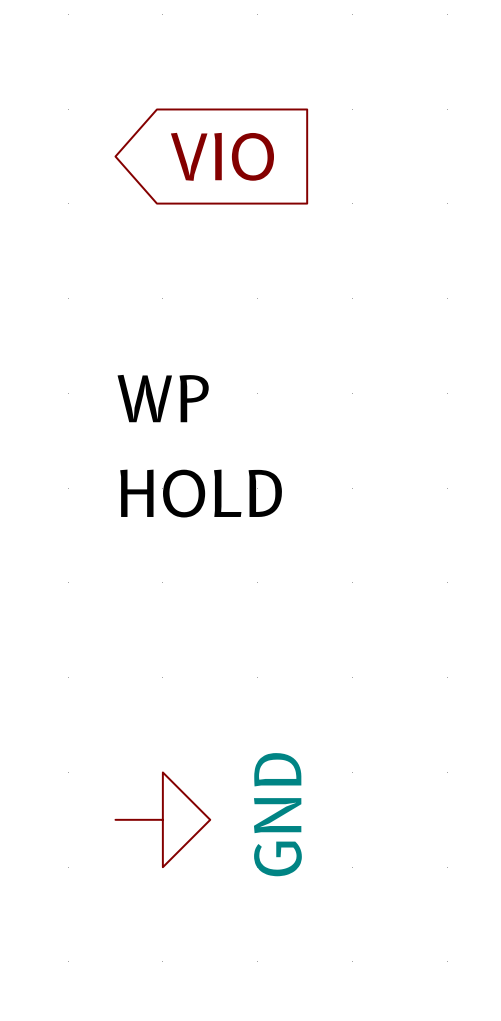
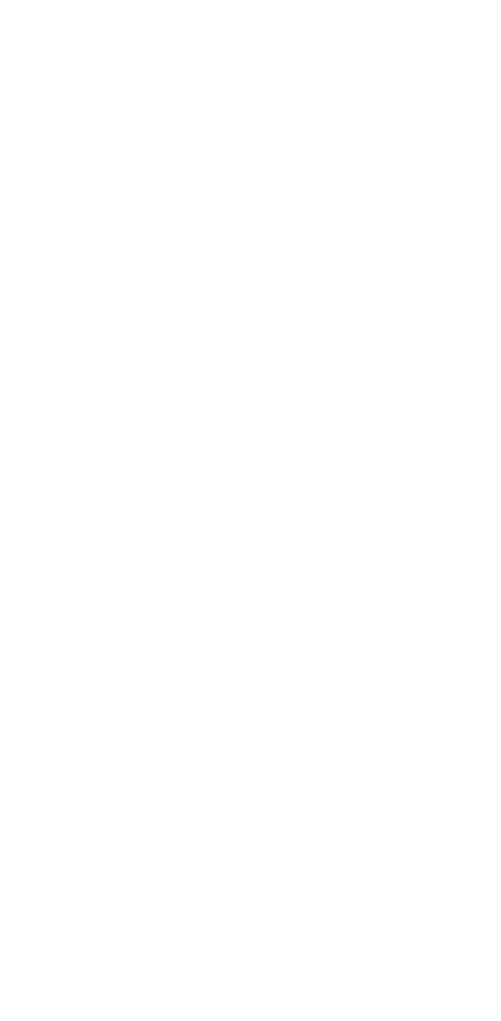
global label: VIO (222, 156) -> none
label: WP (163, 398) -> none
label: HOLD (201, 493) -> none
power symbol: GND (162, 819) -> none

